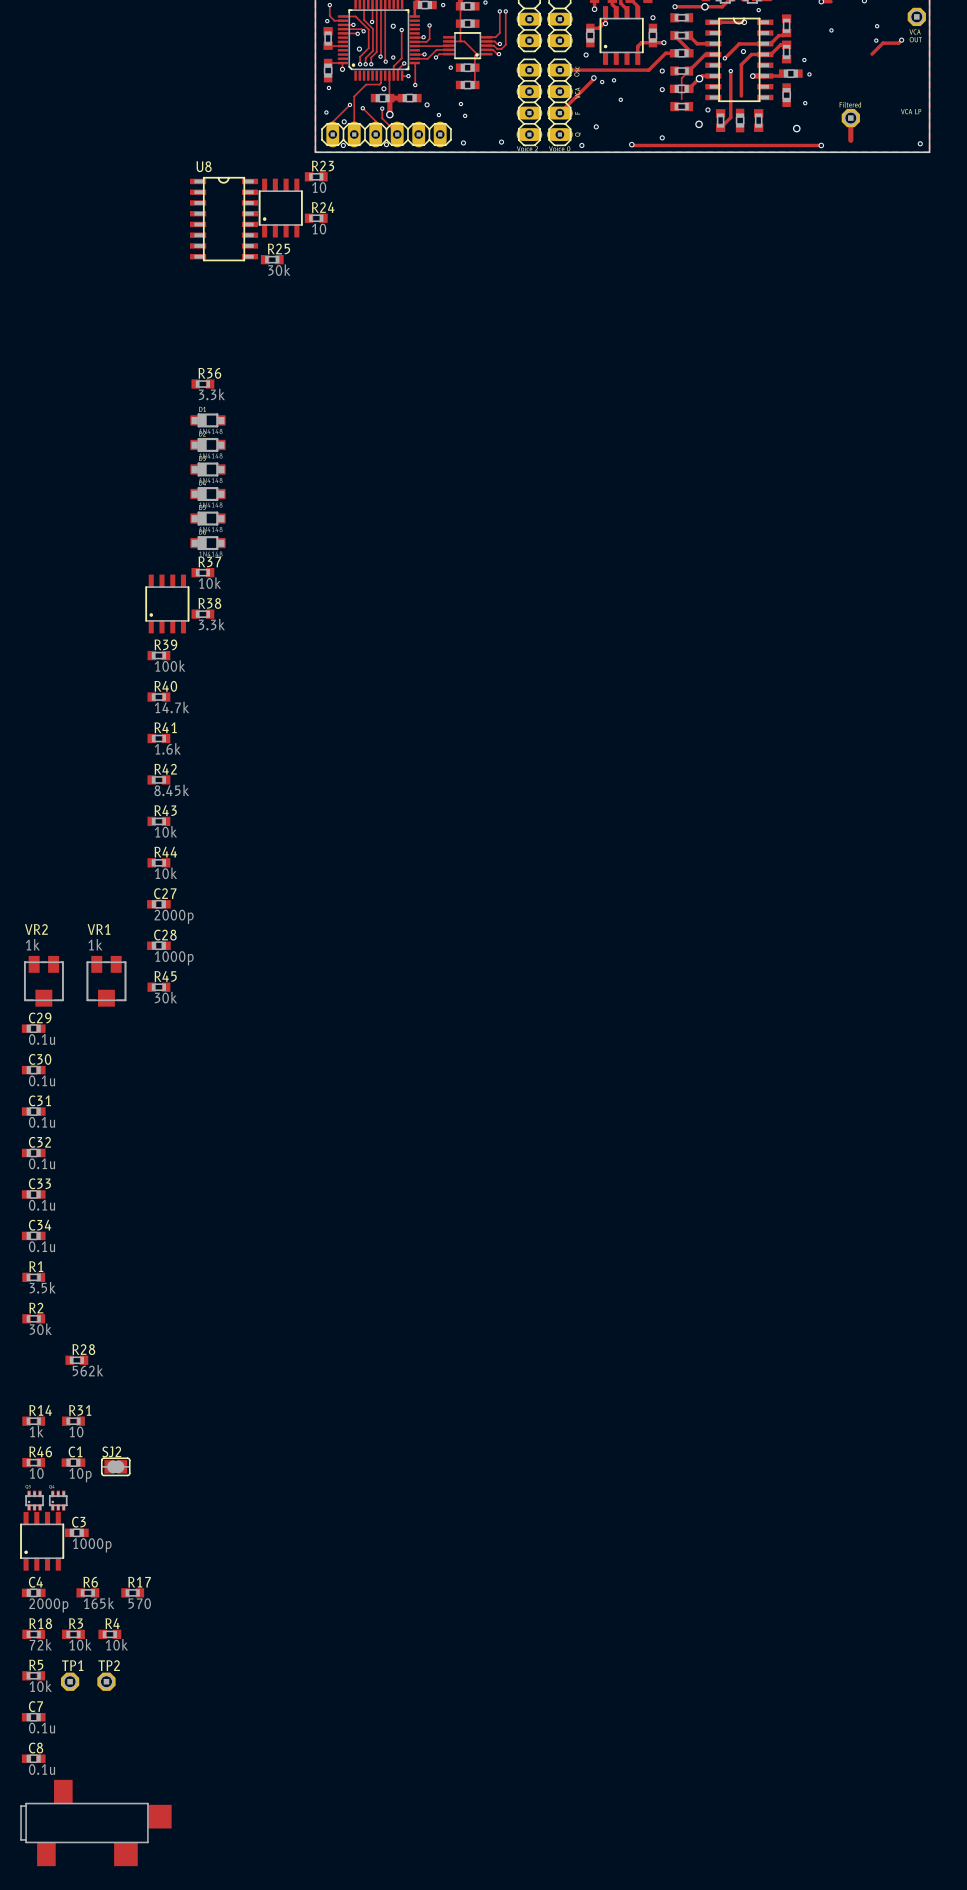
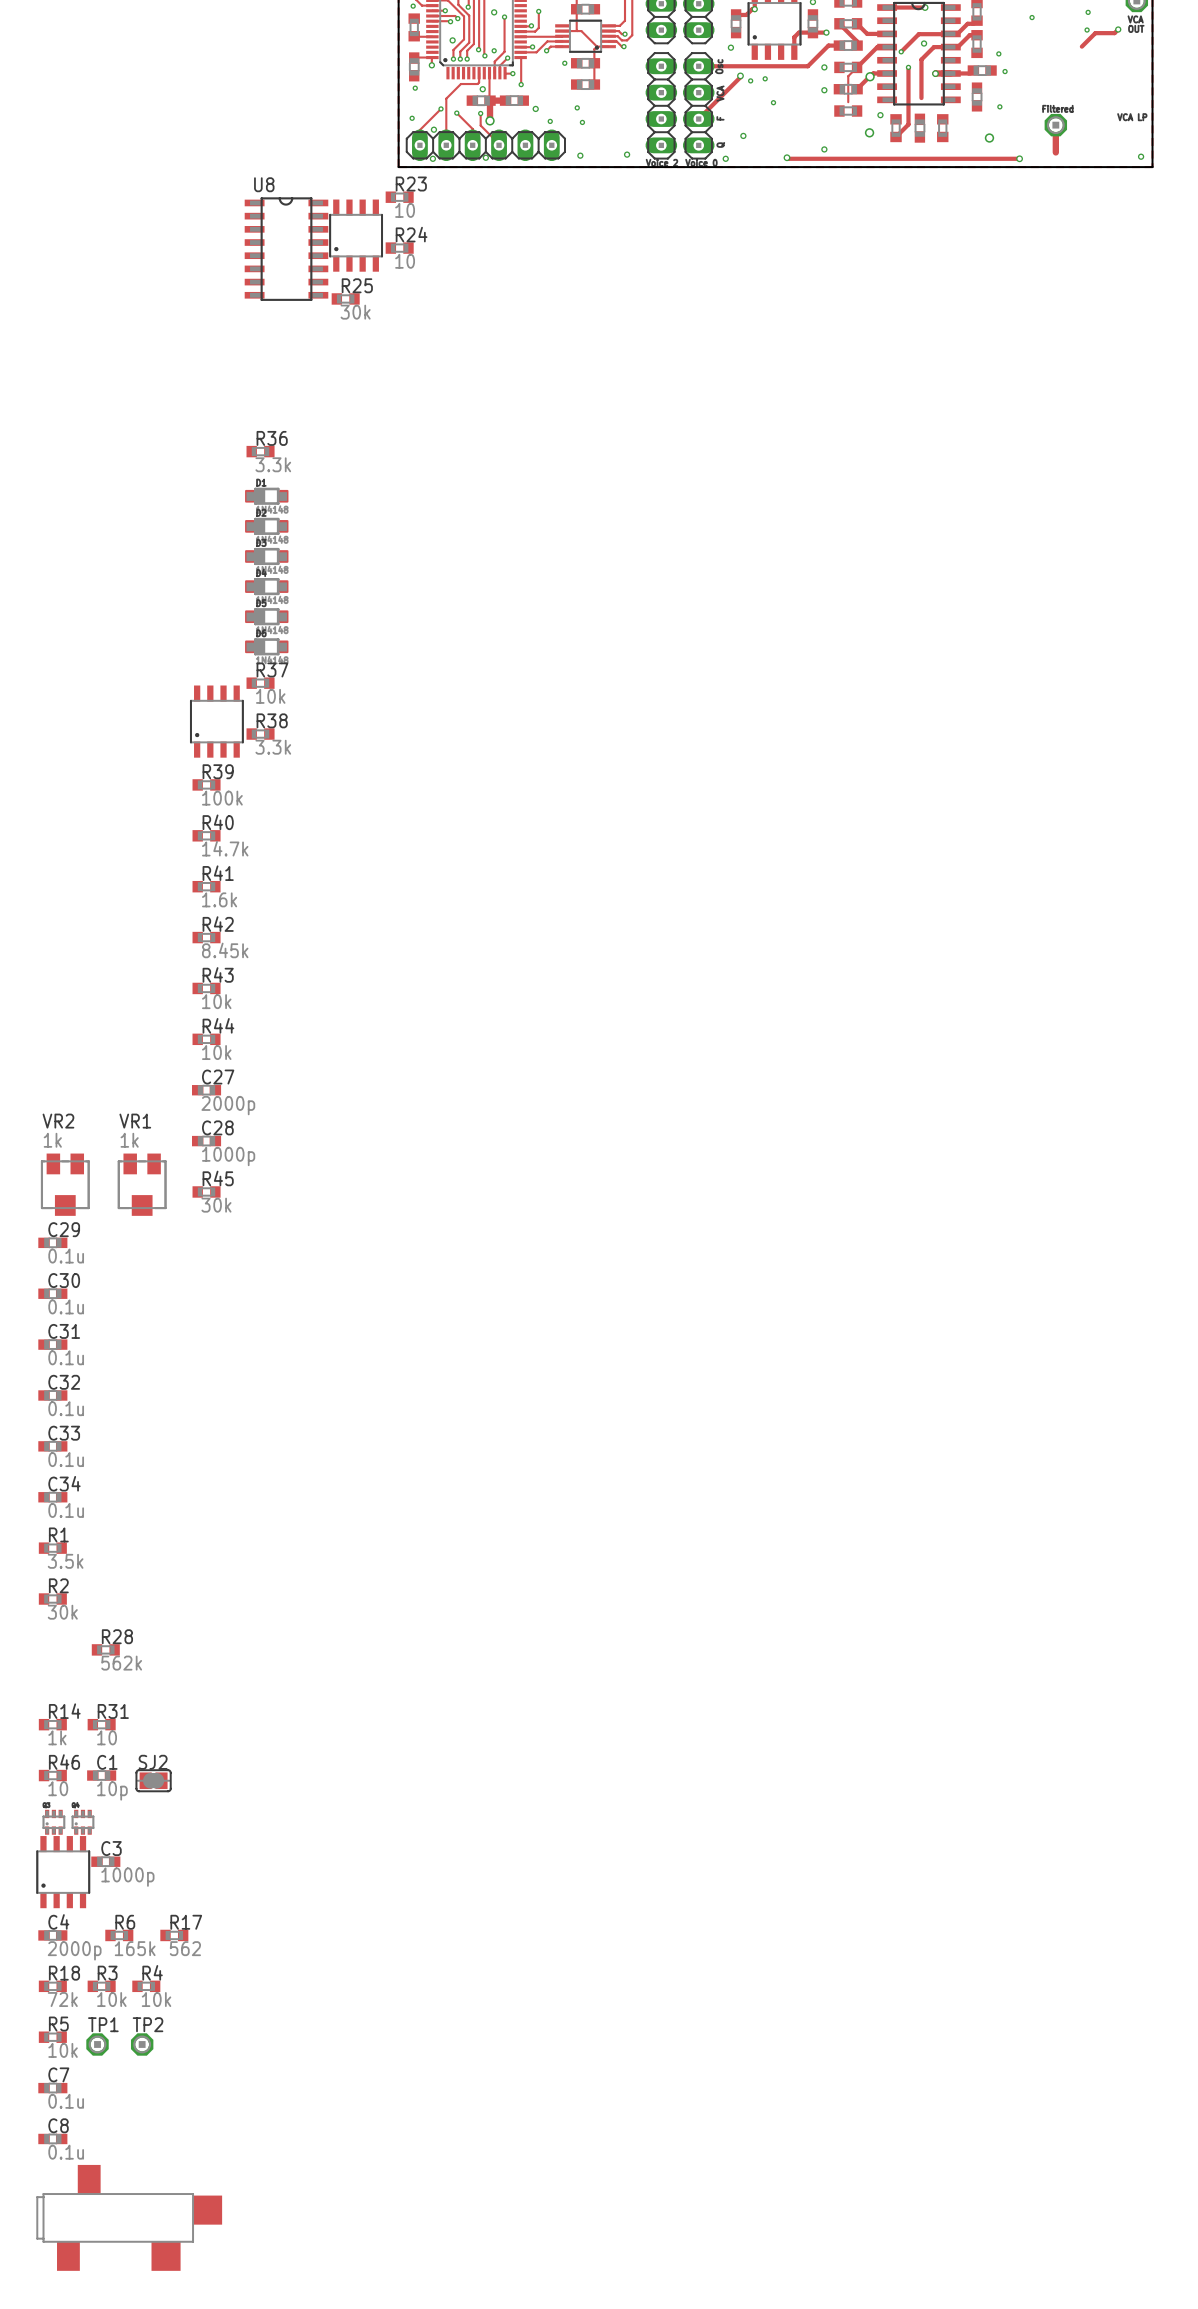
R17 value: 570 (139, 1603) -> 562 (185, 1948)

